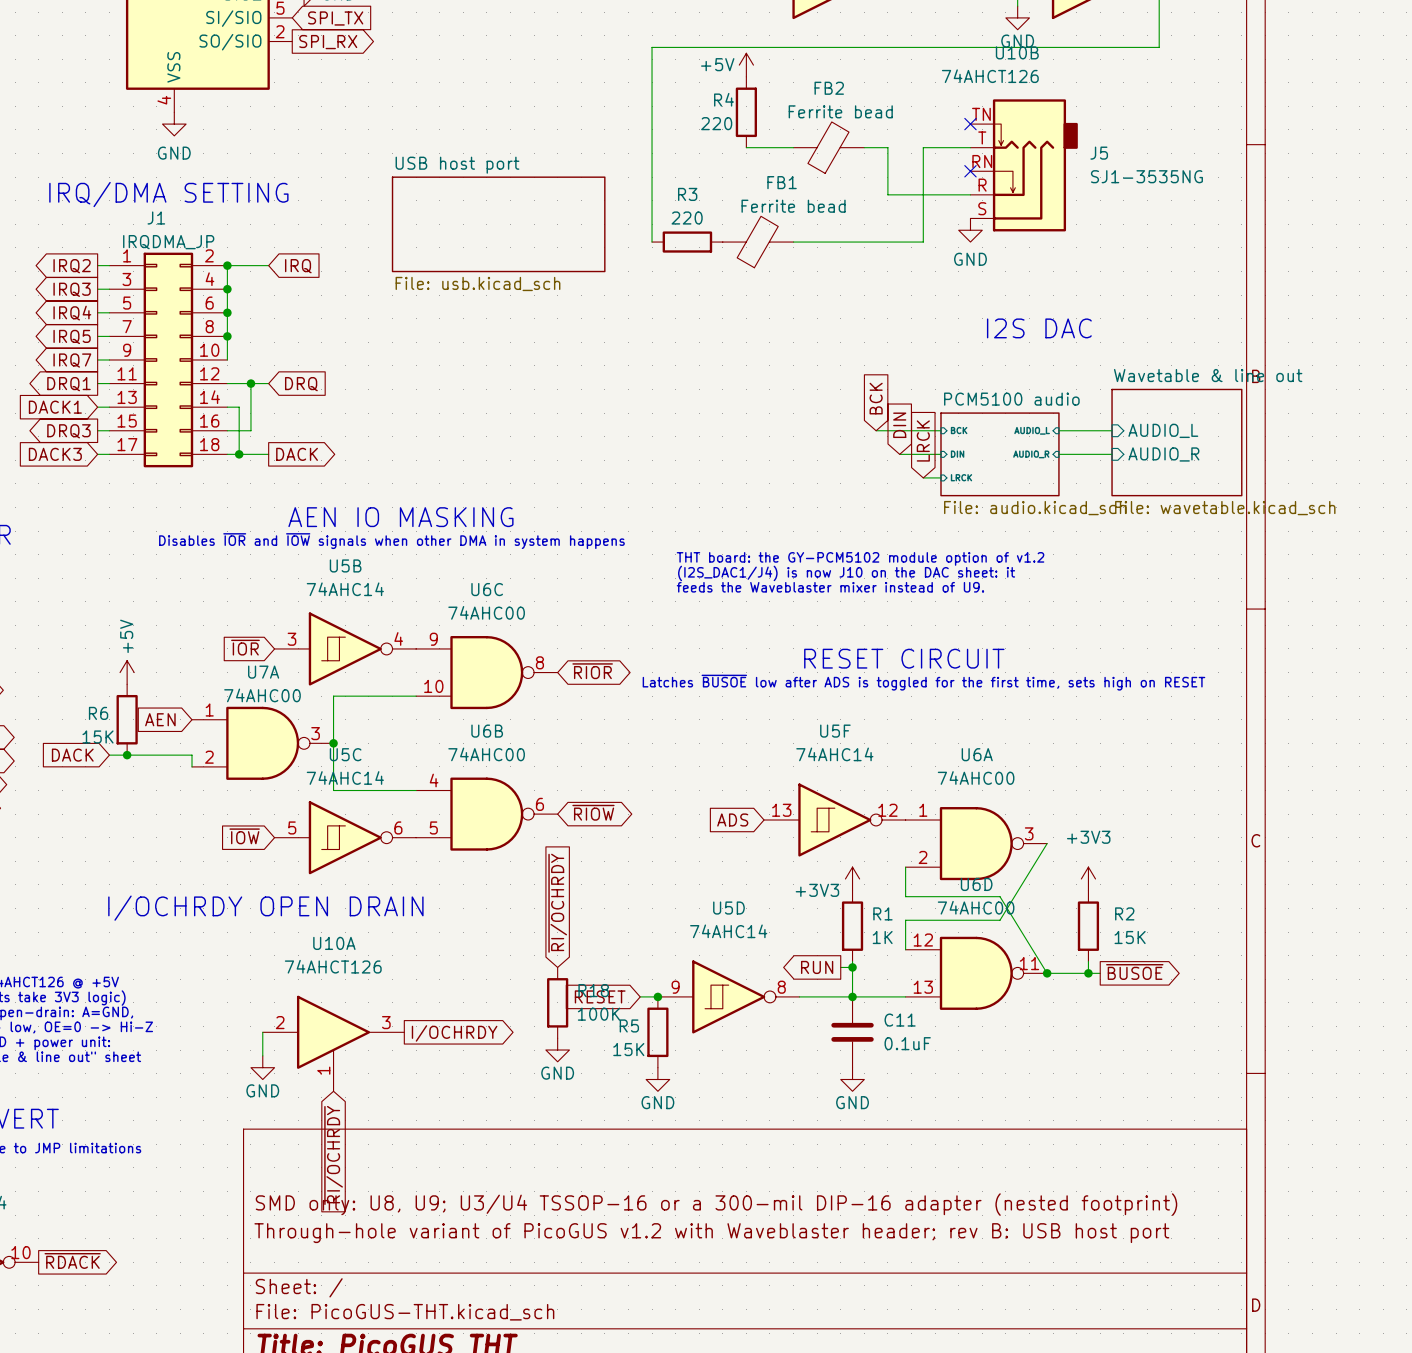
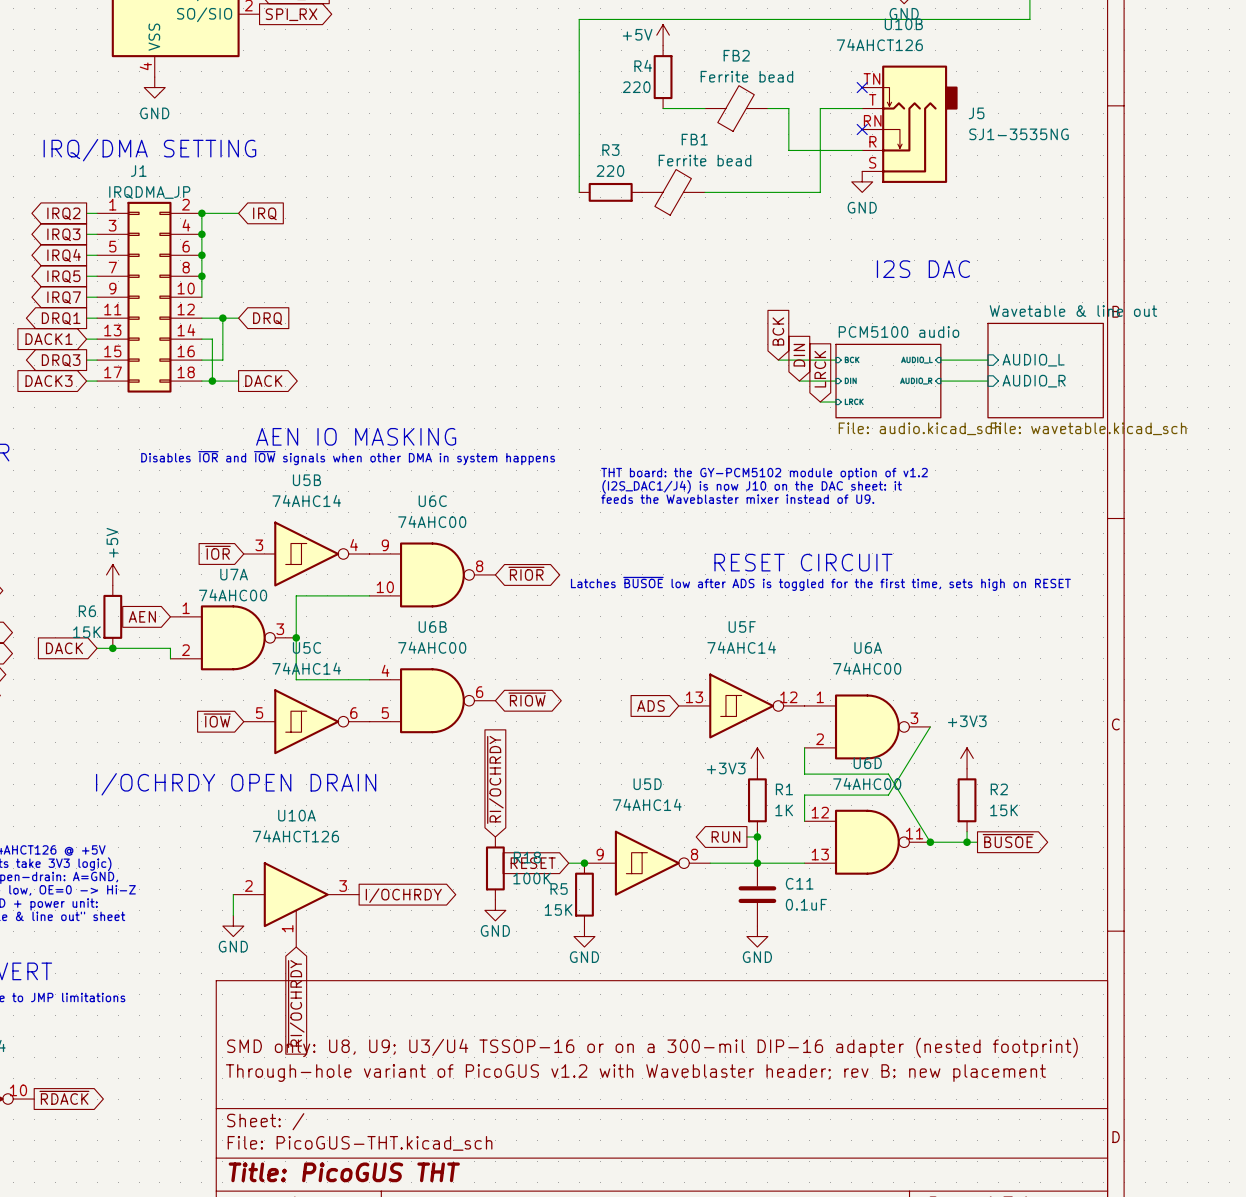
sheet USB host port: File: usb.kicad_sch (498, 224) -> none
title block: SMD only: U8, U9; U3/U4 TSSOP-16 or a 300-mil DIP-16 adapter (nested footprint) (716, 1204) -> SMD only: U8, U9; U3/U4 TSSOP-16 or on a 300-mil DIP-16 adapter (nested footprint) (652, 1047)
title block: Through-hole variant of PicoGUS v1.2 with Waveblaster header; rev B: USB host port (711, 1233) -> Through-hole variant of PicoGUS v1.2 with Waveblaster header; rev B: new placement (635, 1073)

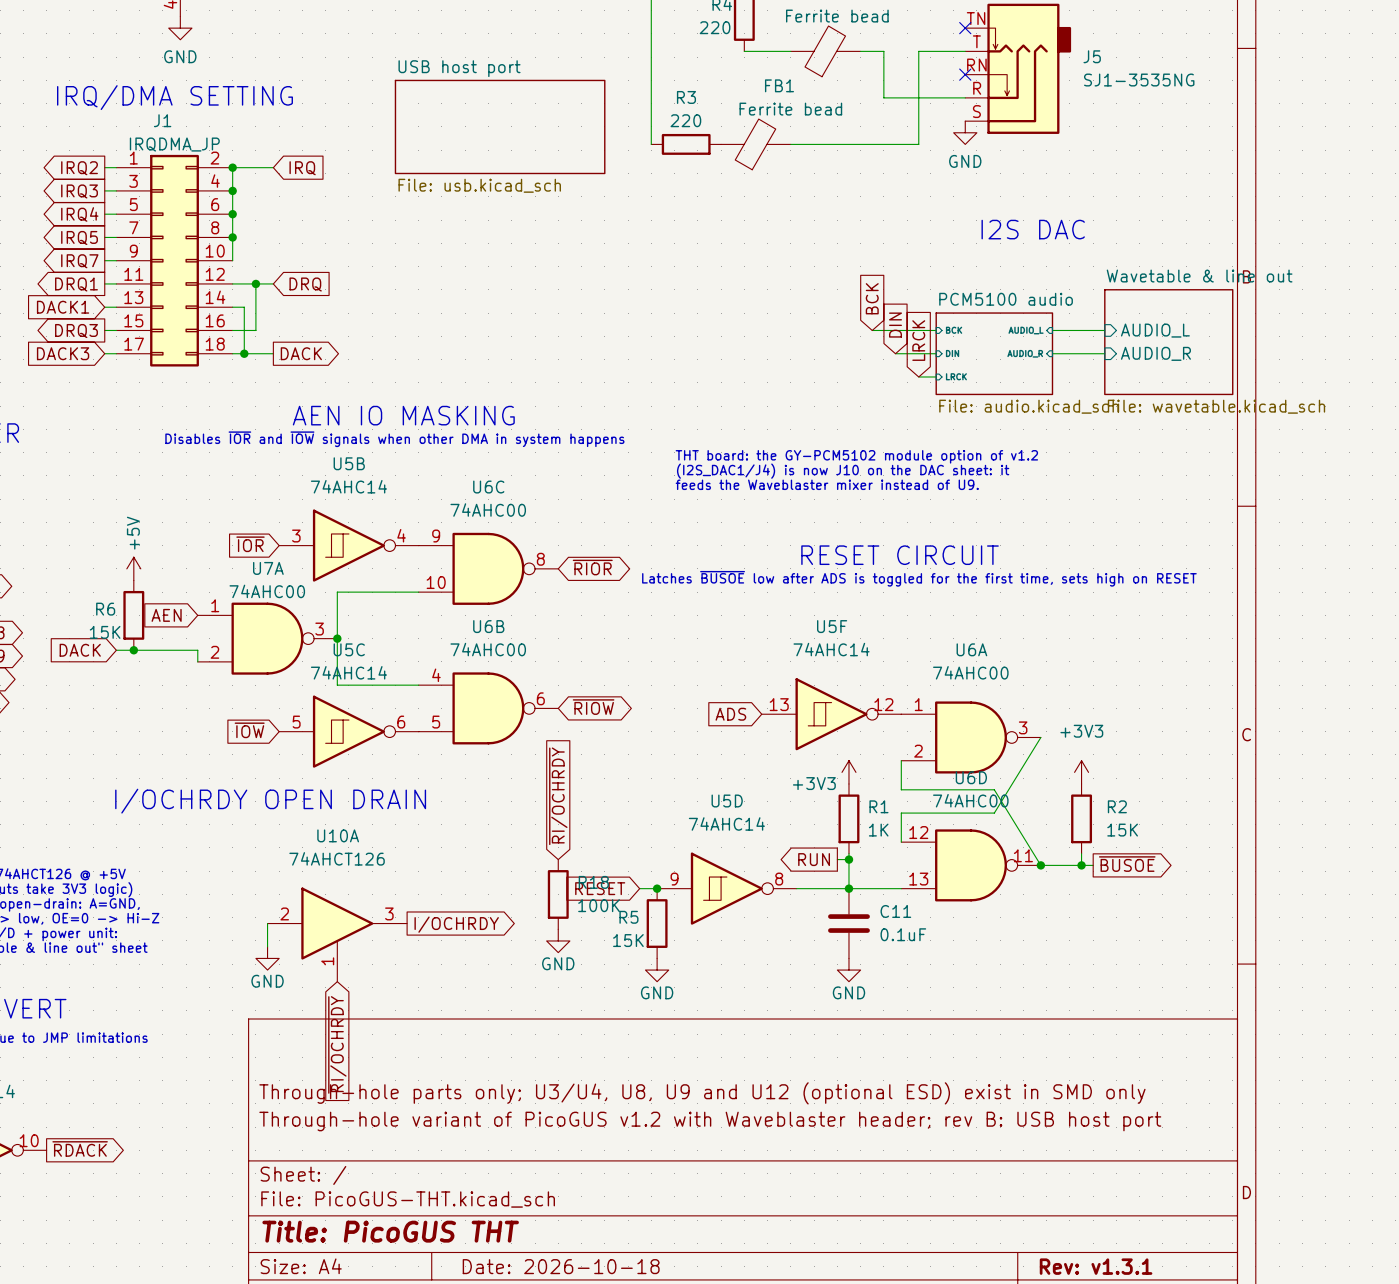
sheet USB host port: none -> File: usb.kicad_sch (500, 126)
title block: SMD only: U8, U9; U3/U4 TSSOP-16 or on a 300-mil DIP-16 adapter (nested footprint) (652, 1047) -> Through-hole parts only; U3/U4, U8, U9 and U12 (optional ESD) exist in SMD only (702, 1093)
title block: Through-hole variant of PicoGUS v1.2 with Waveblaster header; rev B: new placement (635, 1073) -> Through-hole variant of PicoGUS v1.2 with Waveblaster header; rev B: USB host port (710, 1121)

